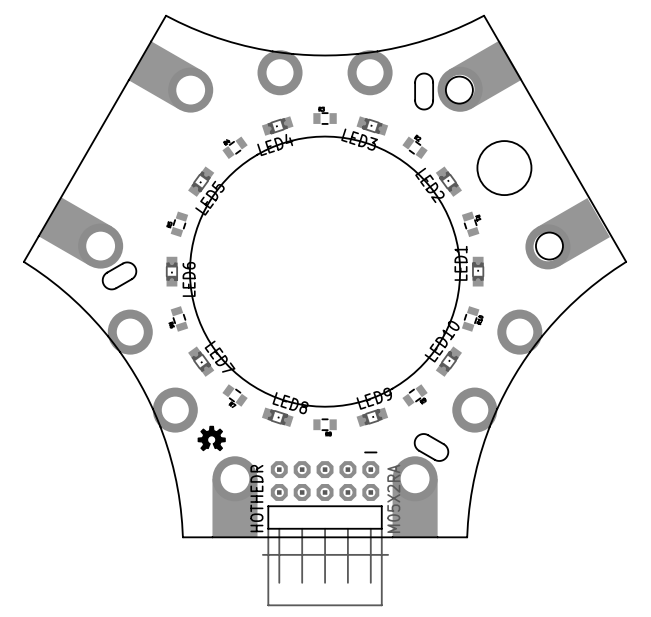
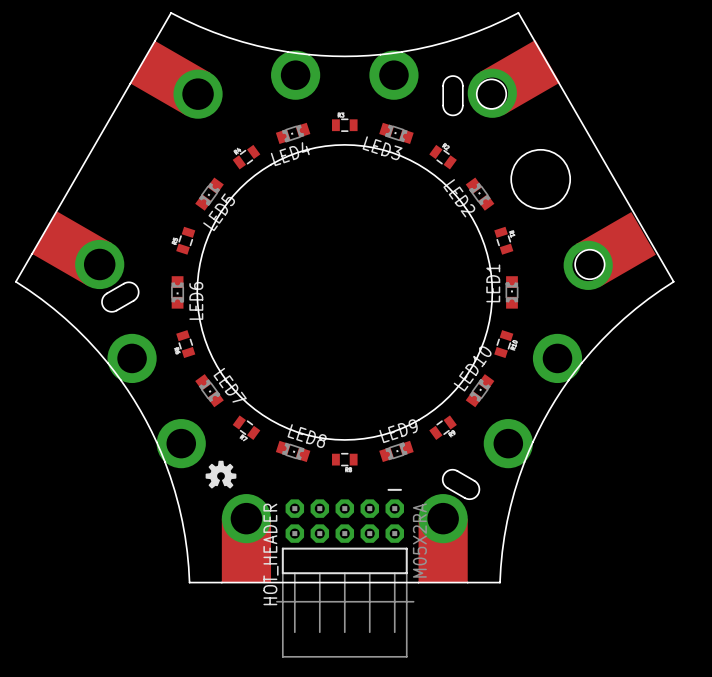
HOTHEDR name: HOTHEDR (256, 498) -> HOT_HEADER (270, 554)

